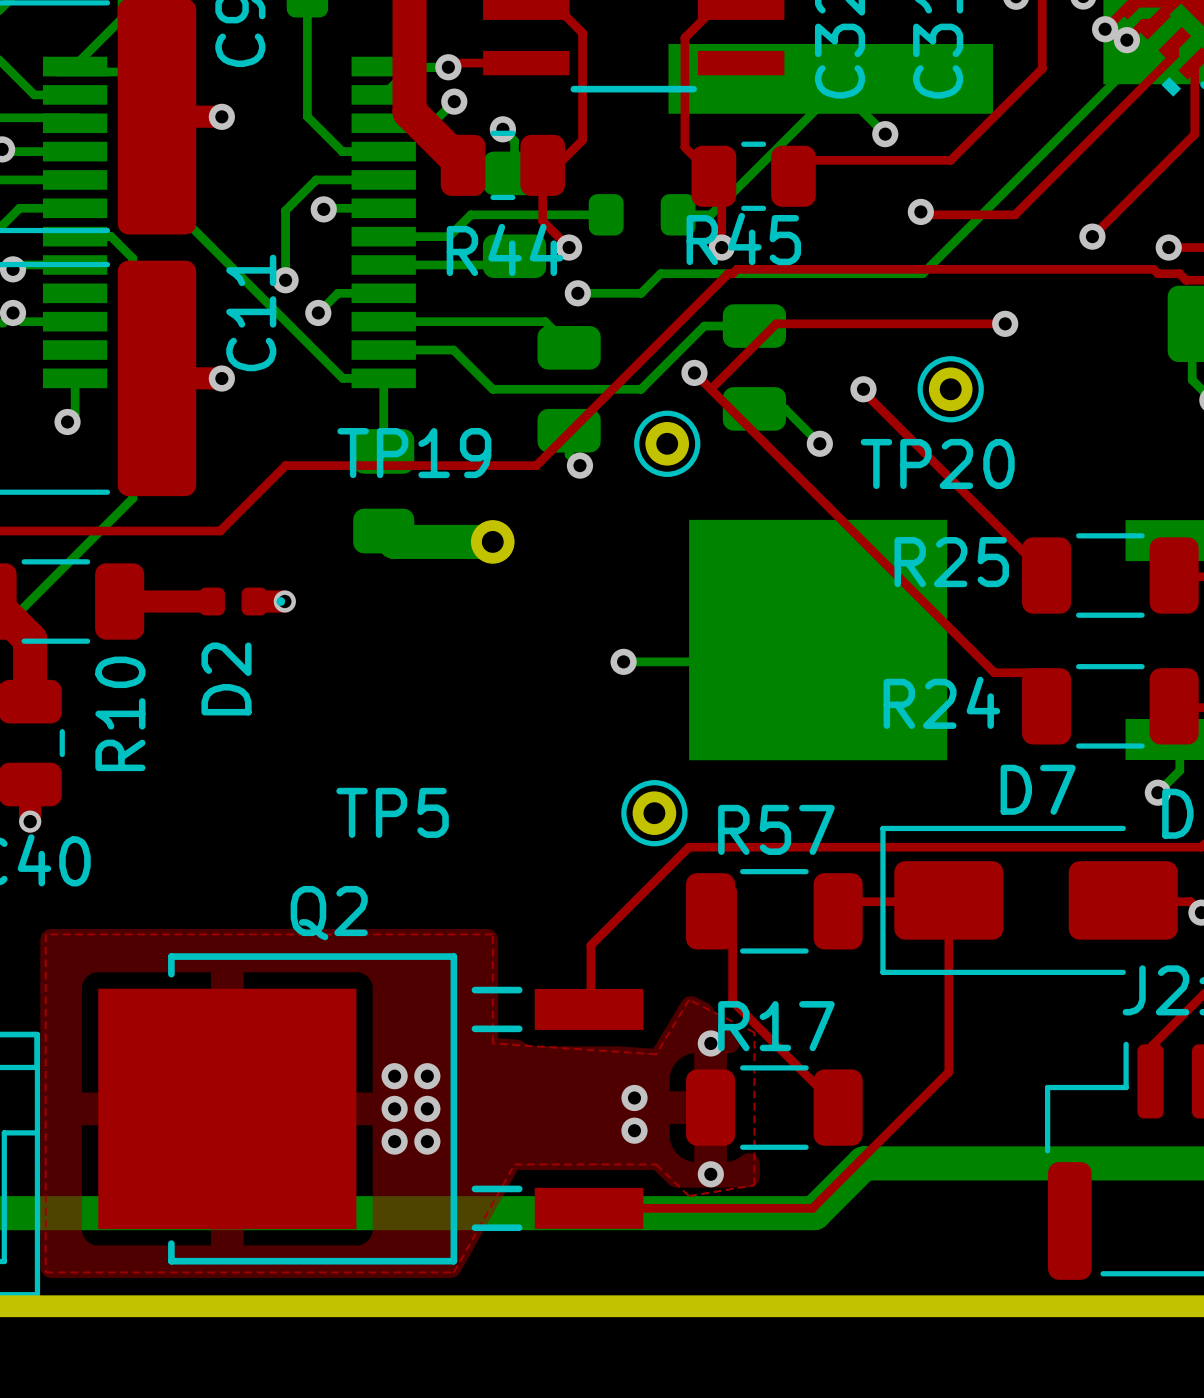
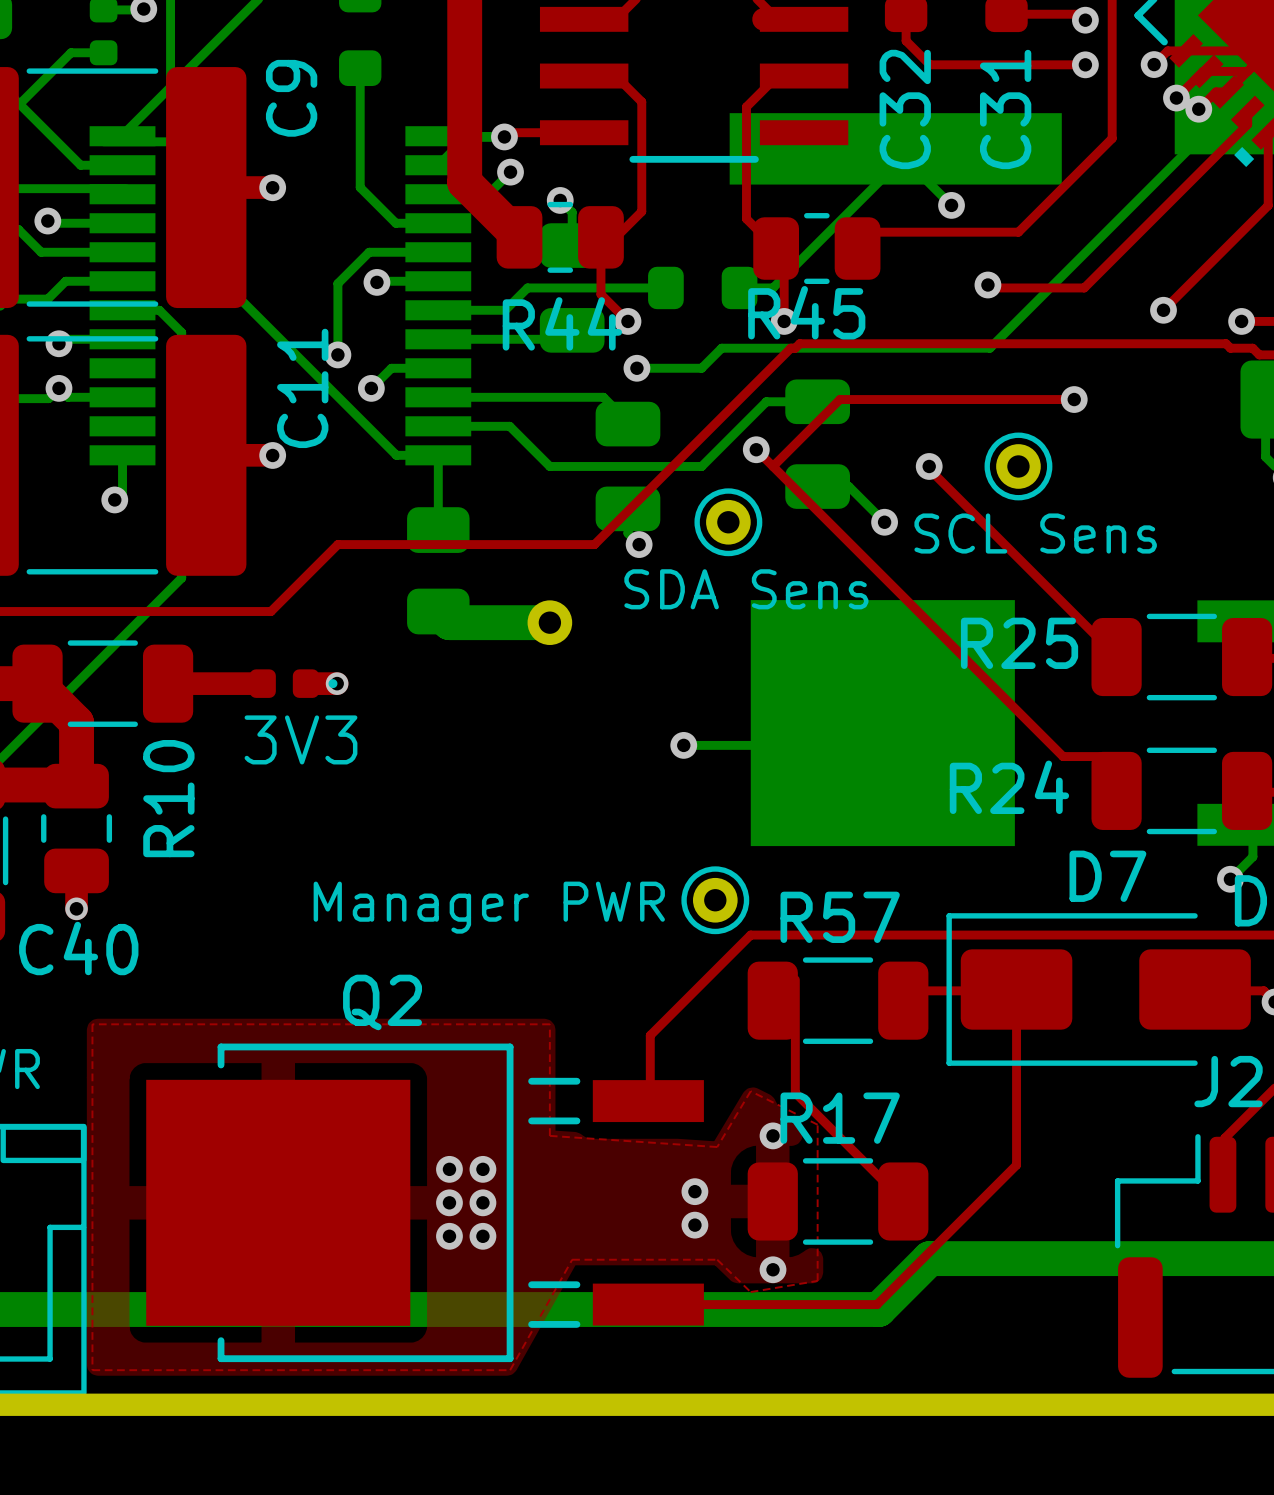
TP19 name: TP19 (414, 453) -> none
text: none -> SCL Sens (1035, 533)
TP20 name: TP20 (937, 463) -> none
text: none -> SDA Sens (746, 589)
text: none -> 3V3 (300, 739)
D2 name: D2 (226, 678) -> none
TP5 name: TP5 (392, 812) -> none
text: none -> Manager PWR (489, 907)

